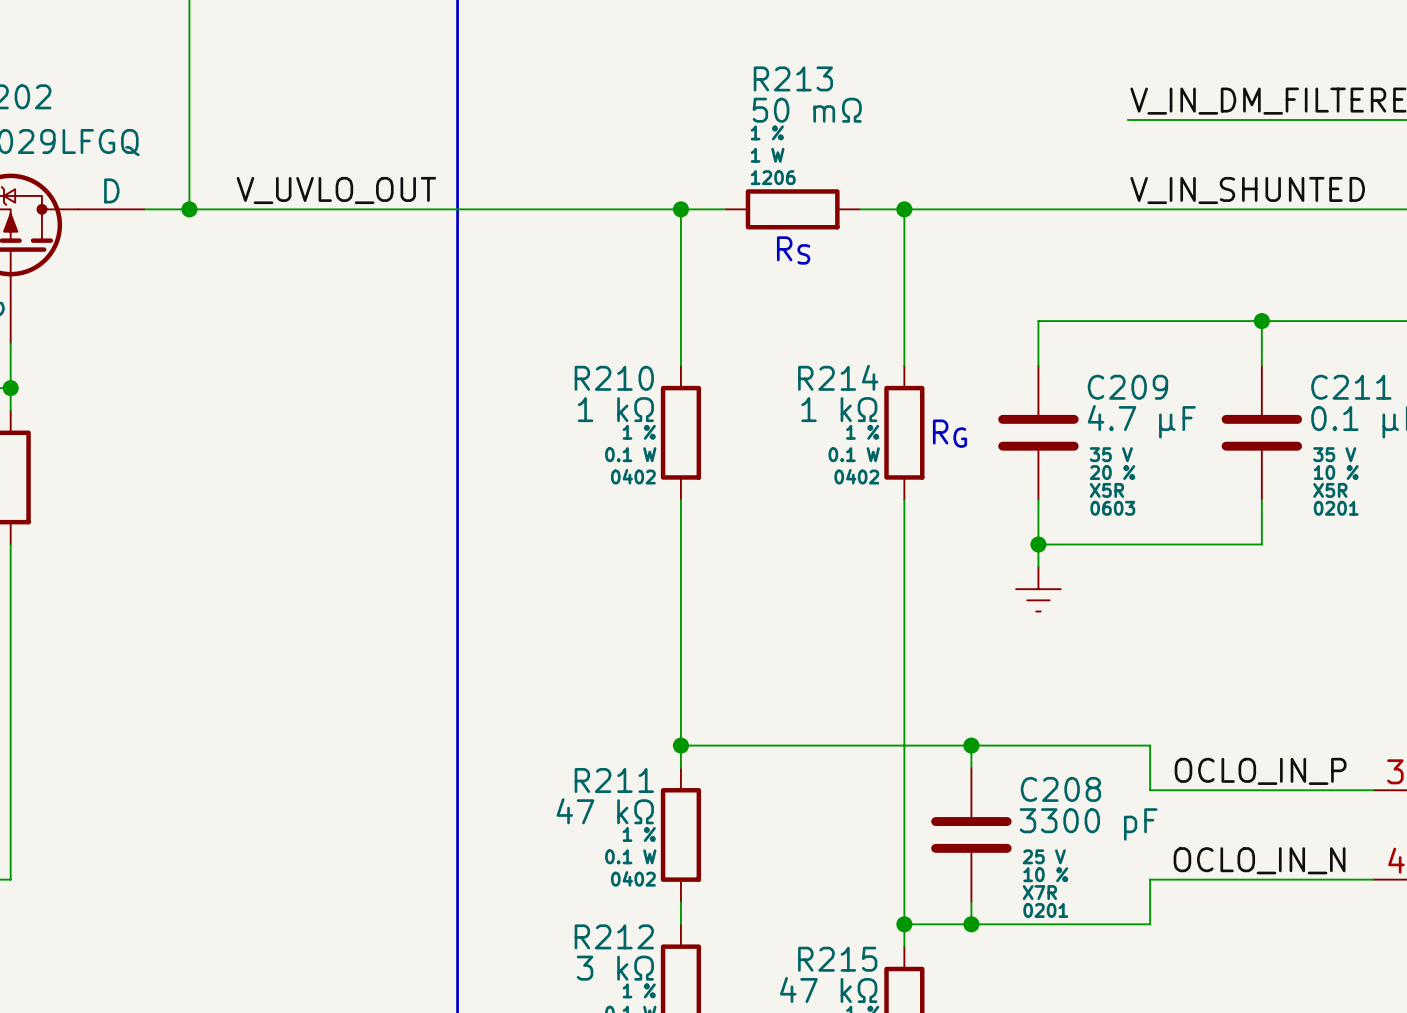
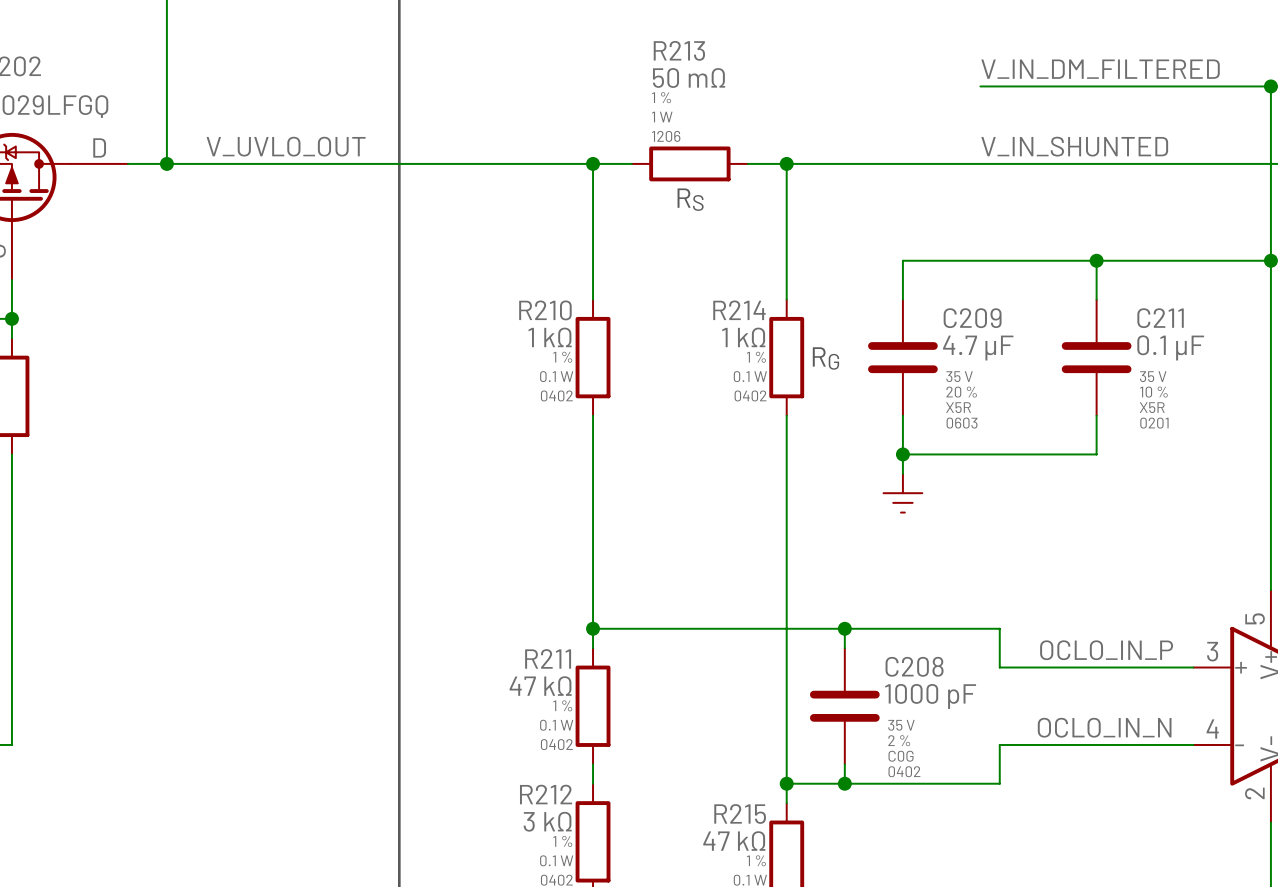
C208 value: 3300 pF (1088, 824) -> 1000 pF (930, 696)
C208 text: 25 V (1044, 856) -> 35 V (901, 725)
C208 text: 10 % (1045, 874) -> 2 % (899, 740)
C208 text: X7R (1039, 892) -> C0G (901, 756)
C208 text: 0201 (1045, 910) -> 0402 (904, 771)

